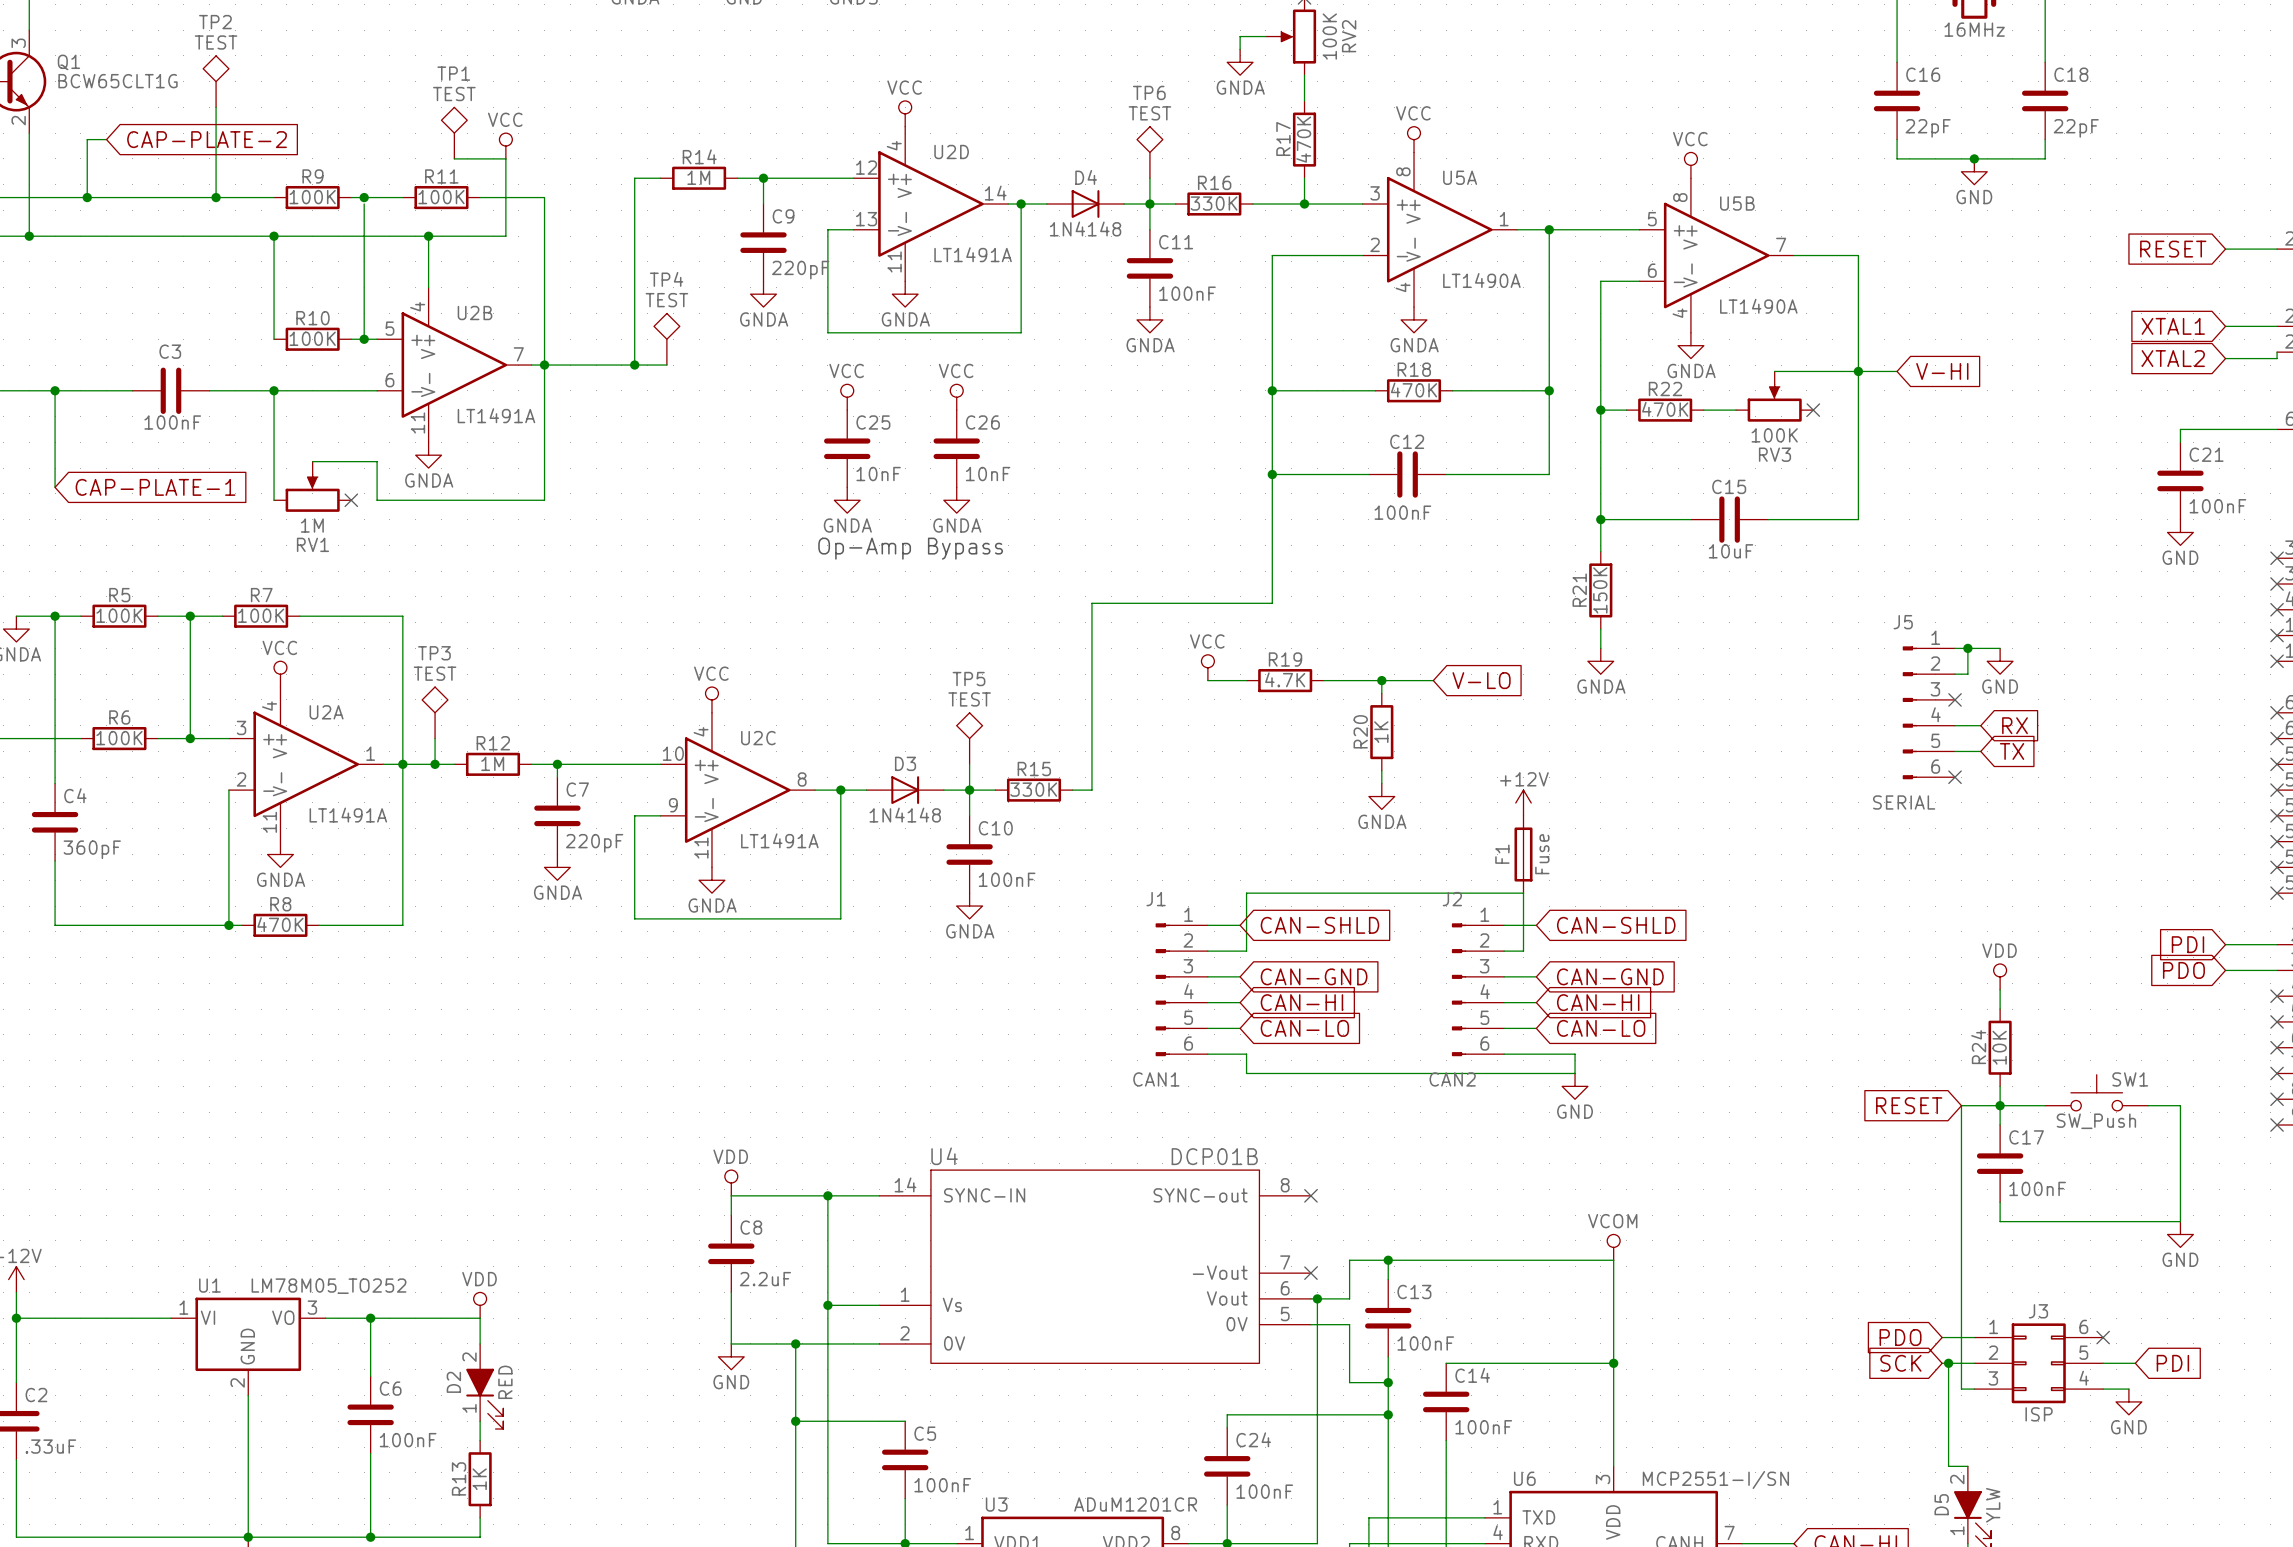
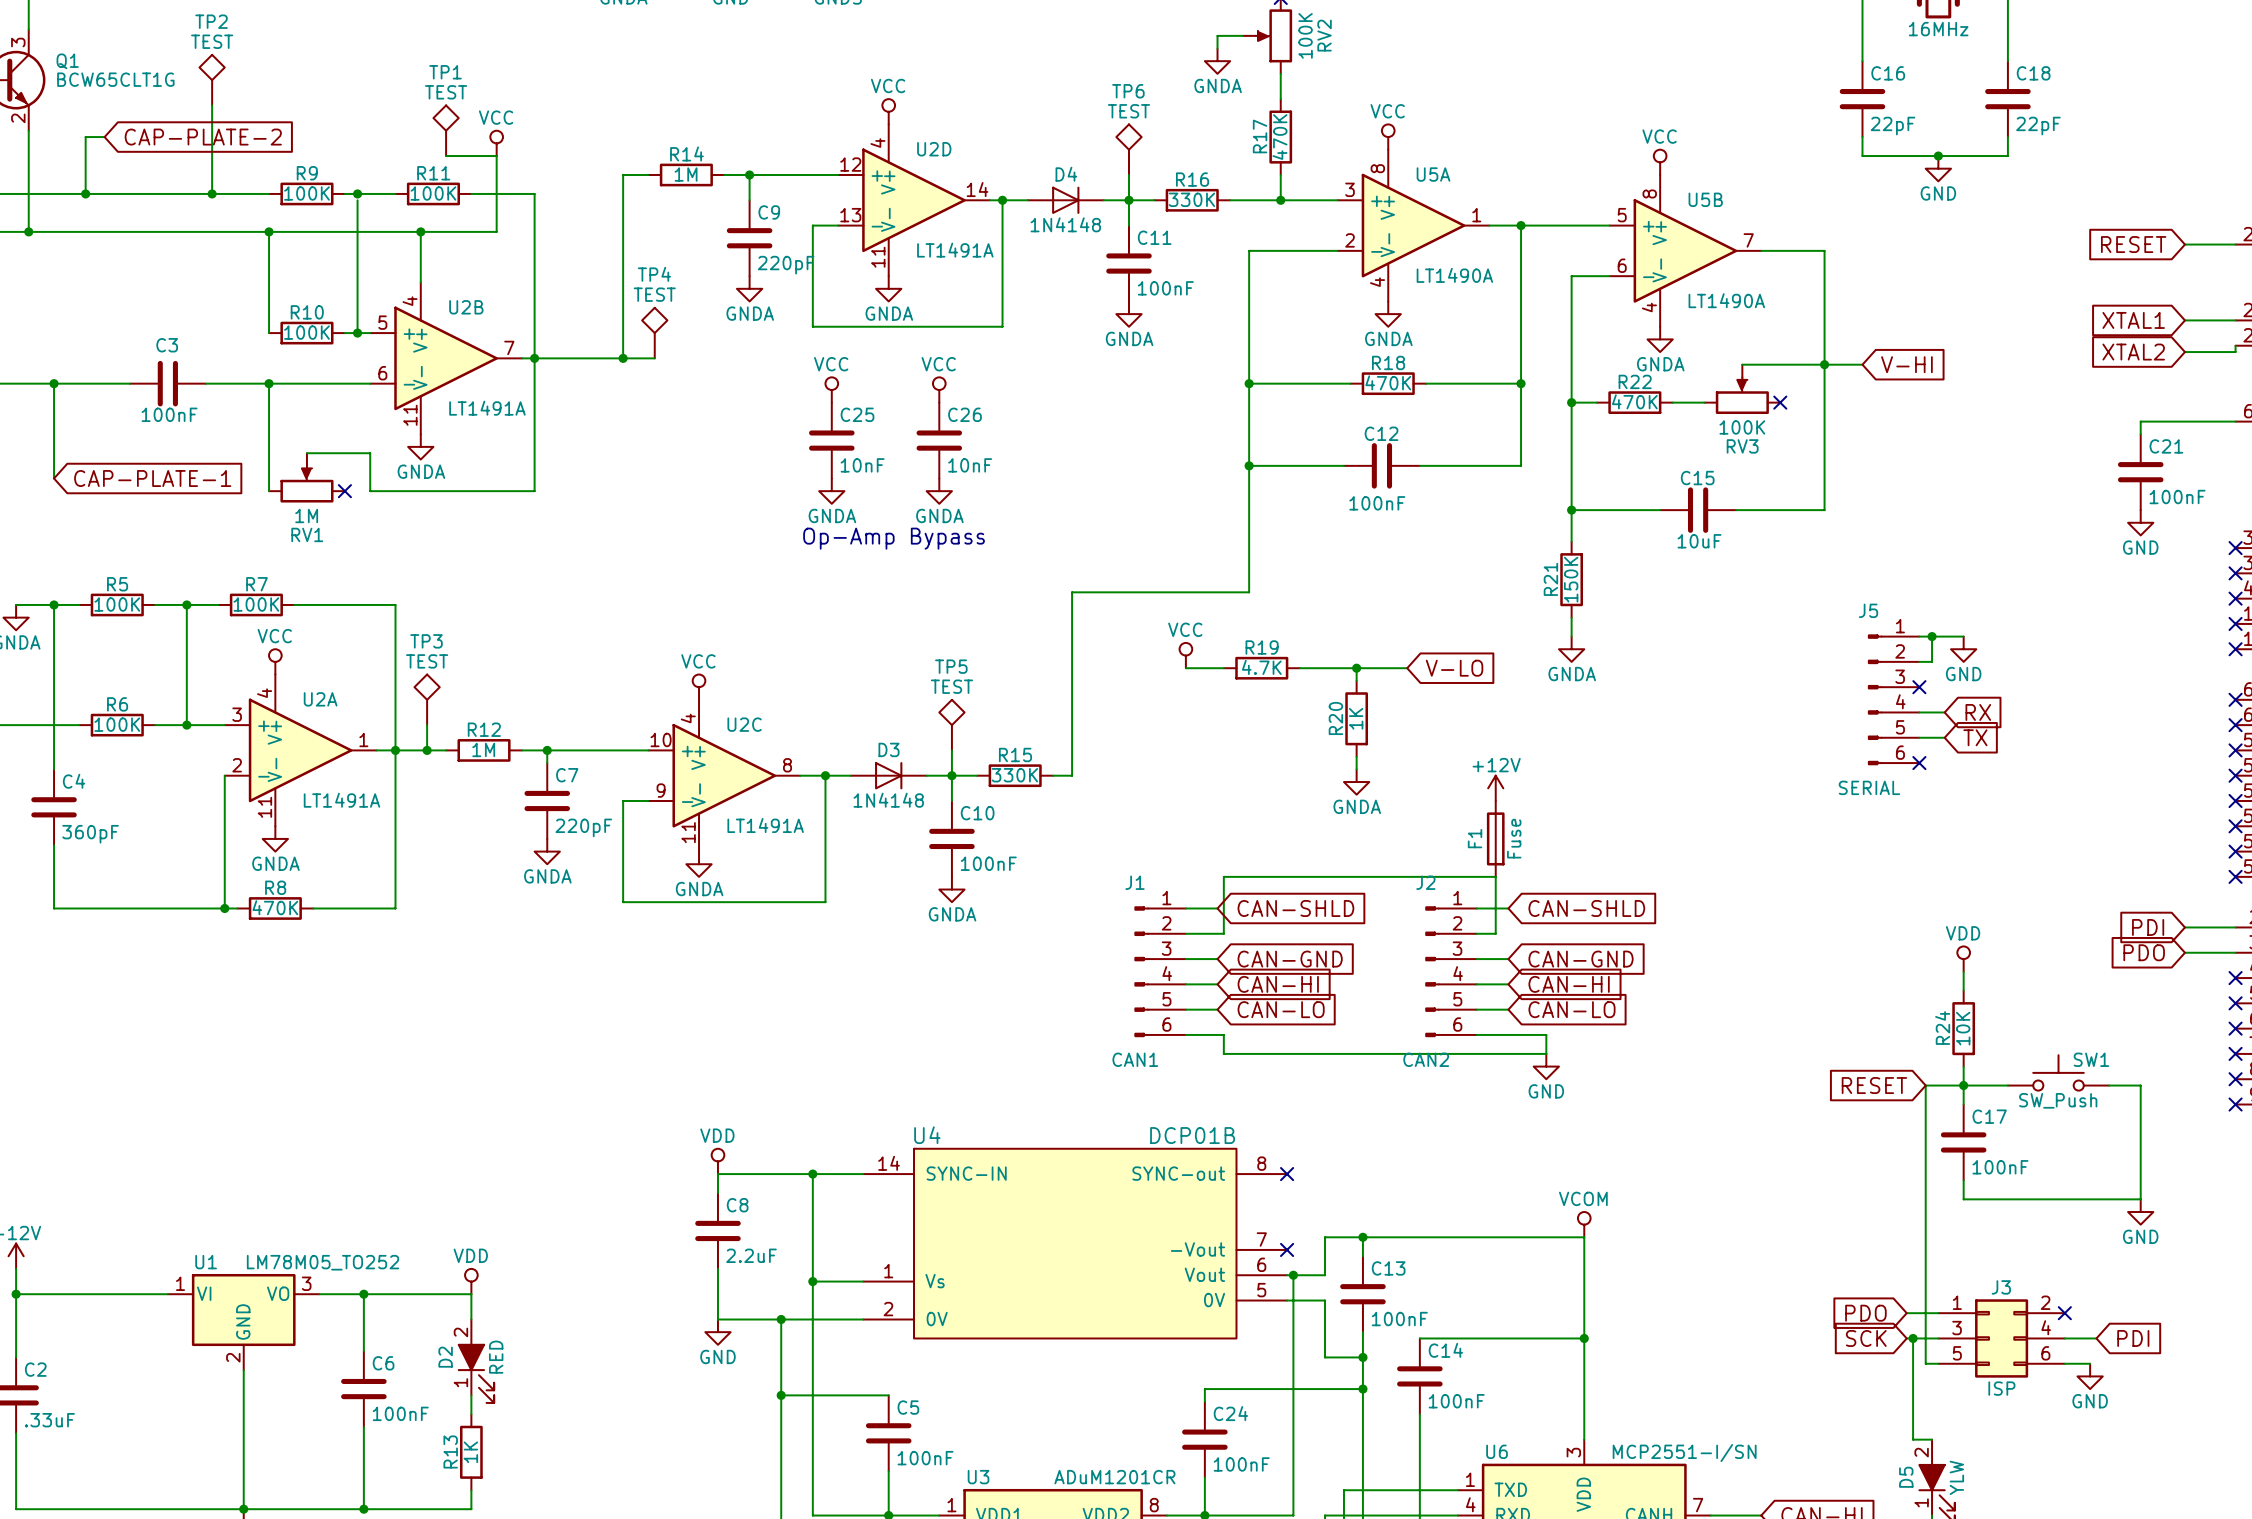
J3 pin number: 6 (2083, 1326) -> 2 (2045, 1302)
J3 pin number: 2 (1993, 1352) -> 3 (1957, 1328)
J3 pin number: 5 (2083, 1352) -> 4 (2046, 1327)
J3 pin number: 3 (1993, 1378) -> 5 (1957, 1353)
J3 pin number: 4 (2084, 1378) -> 6 (2045, 1353)

